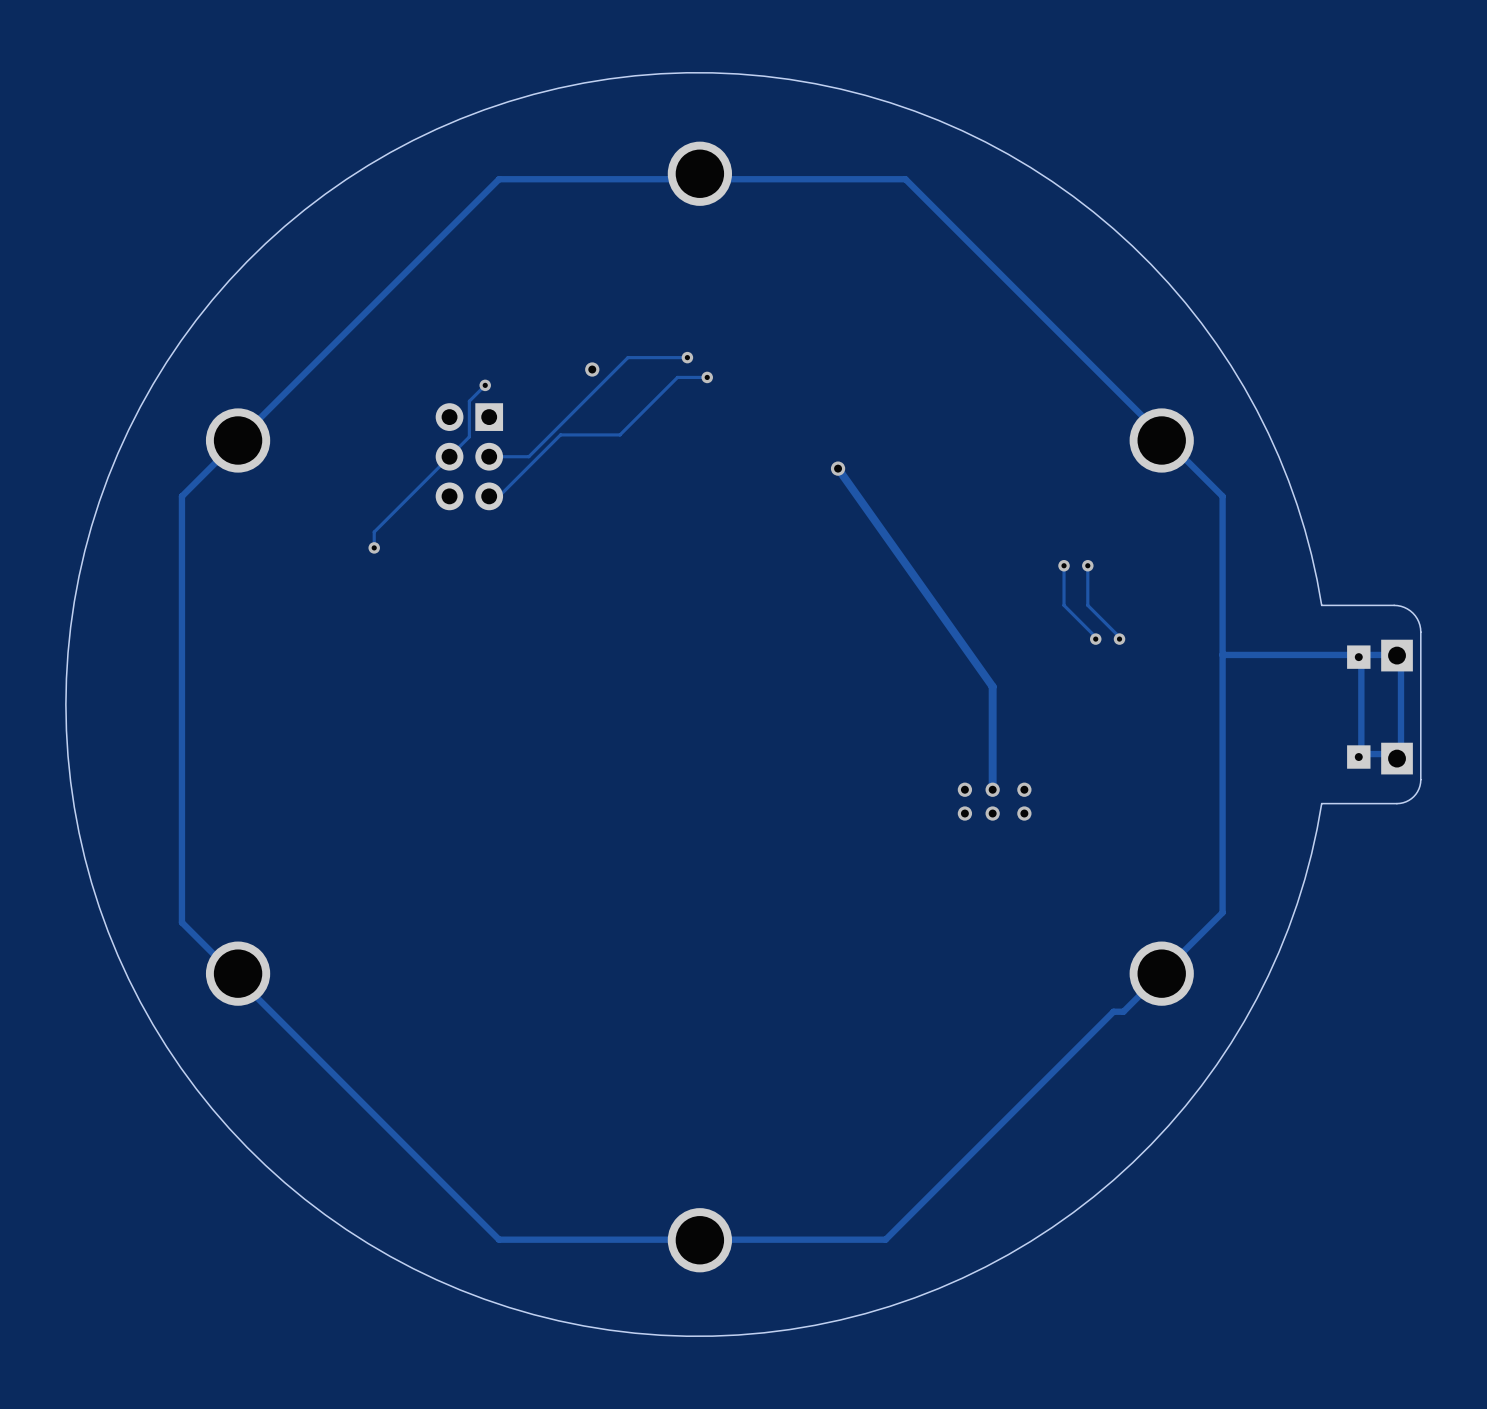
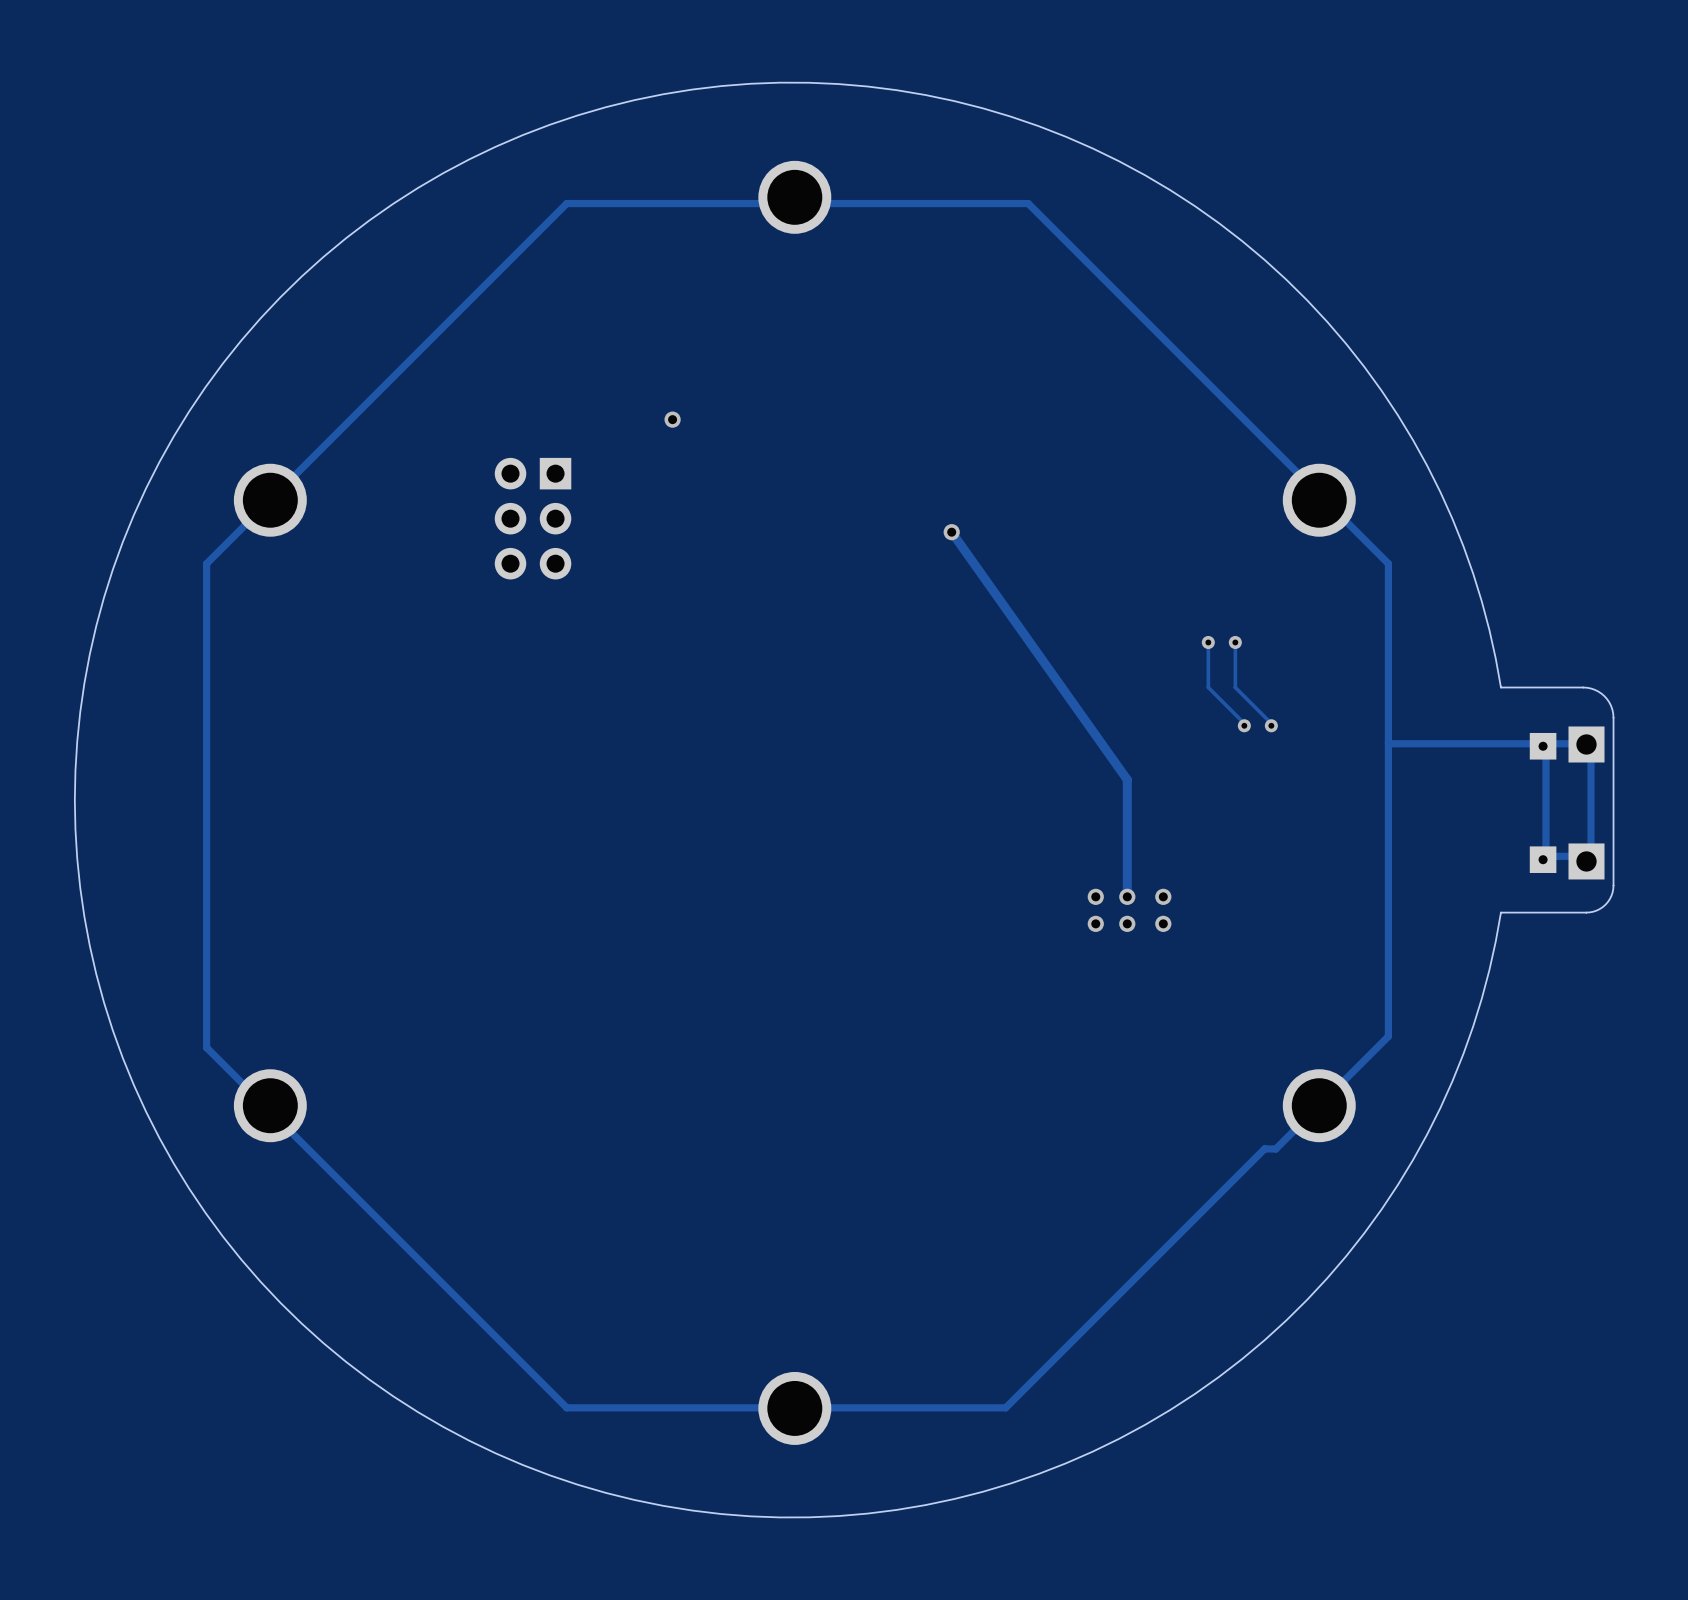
track: (687, 357) (627, 357) (528, 456) (489, 456) -> none
via: (687, 357) -> none
track: (707, 377) (677, 377) (620, 434) (560, 434) (499, 496) (489, 496) -> none
via: (707, 377) -> none
track: (485, 385) (469, 401) (469, 436) (374, 532) (374, 547) -> none
via: (485, 385) -> none
via: (374, 547) -> none

